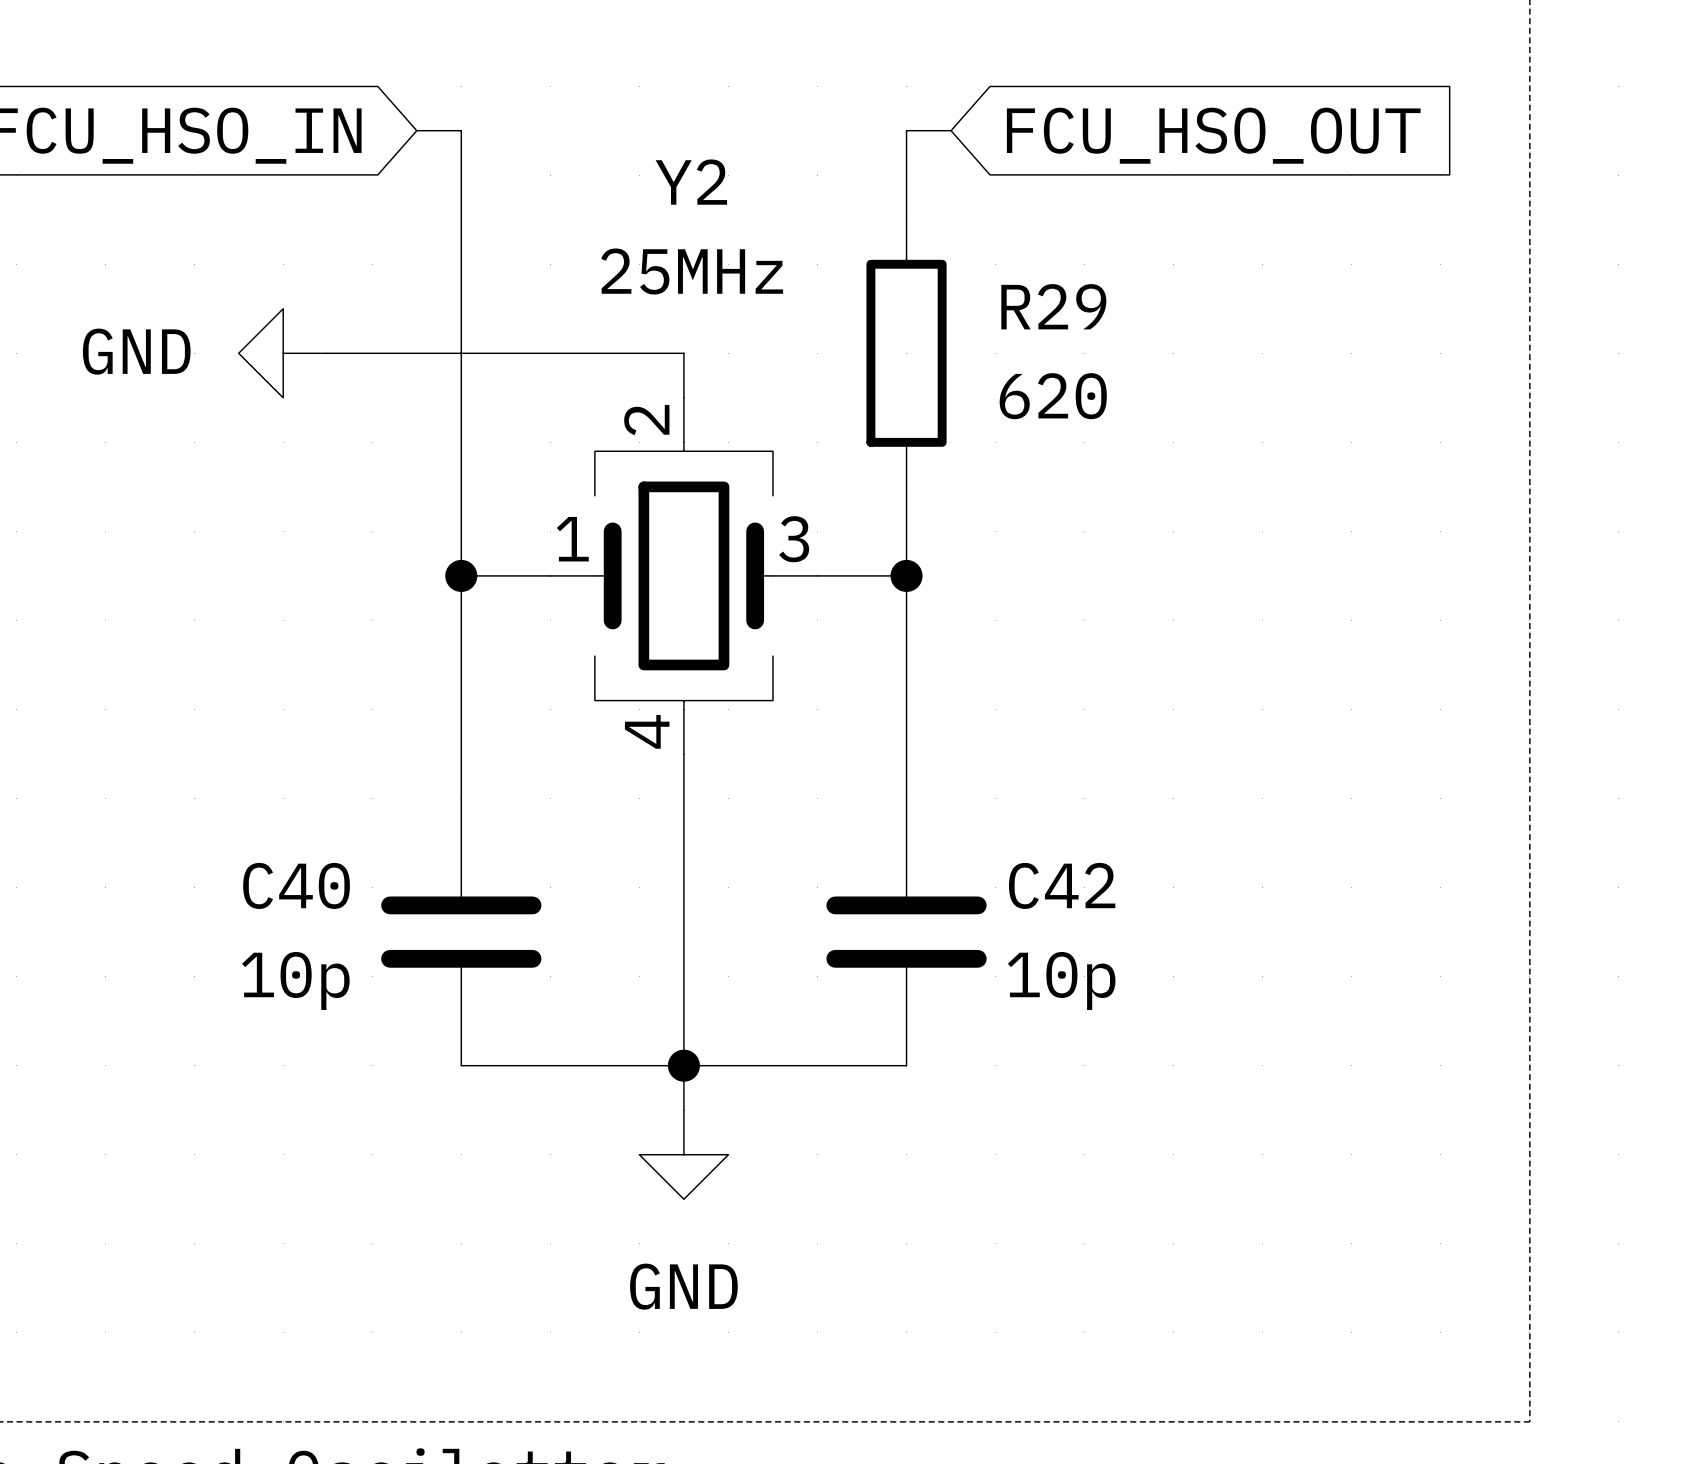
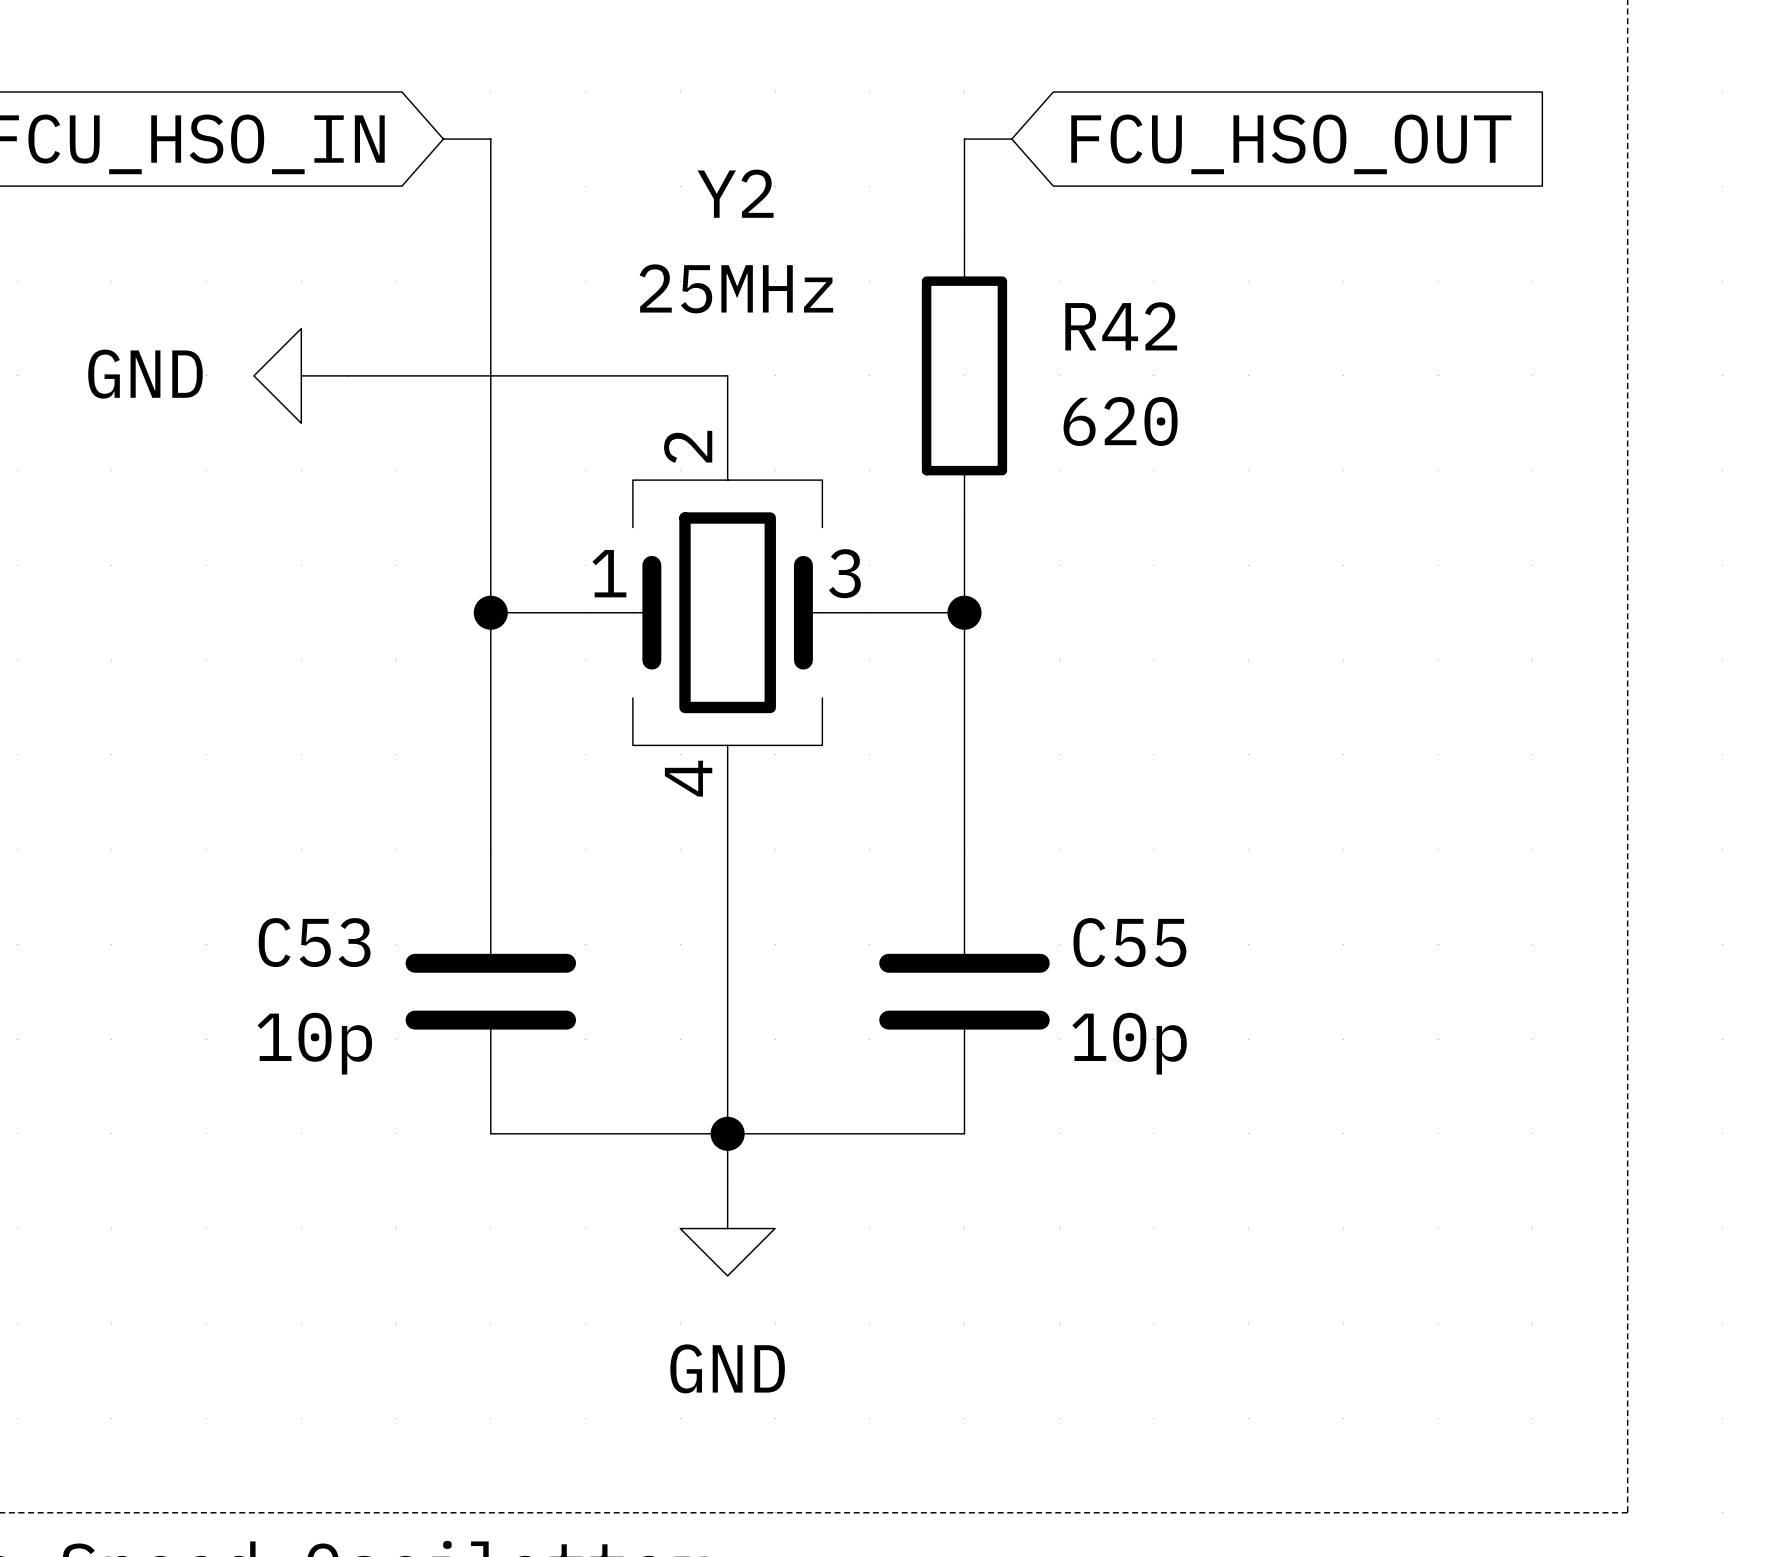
R29 name: R29 (1053, 306) -> R42 (1121, 326)
C40 name: C40 (296, 885) -> C53 (314, 942)
C42 name: C42 (1062, 885) -> C55 (1129, 942)

